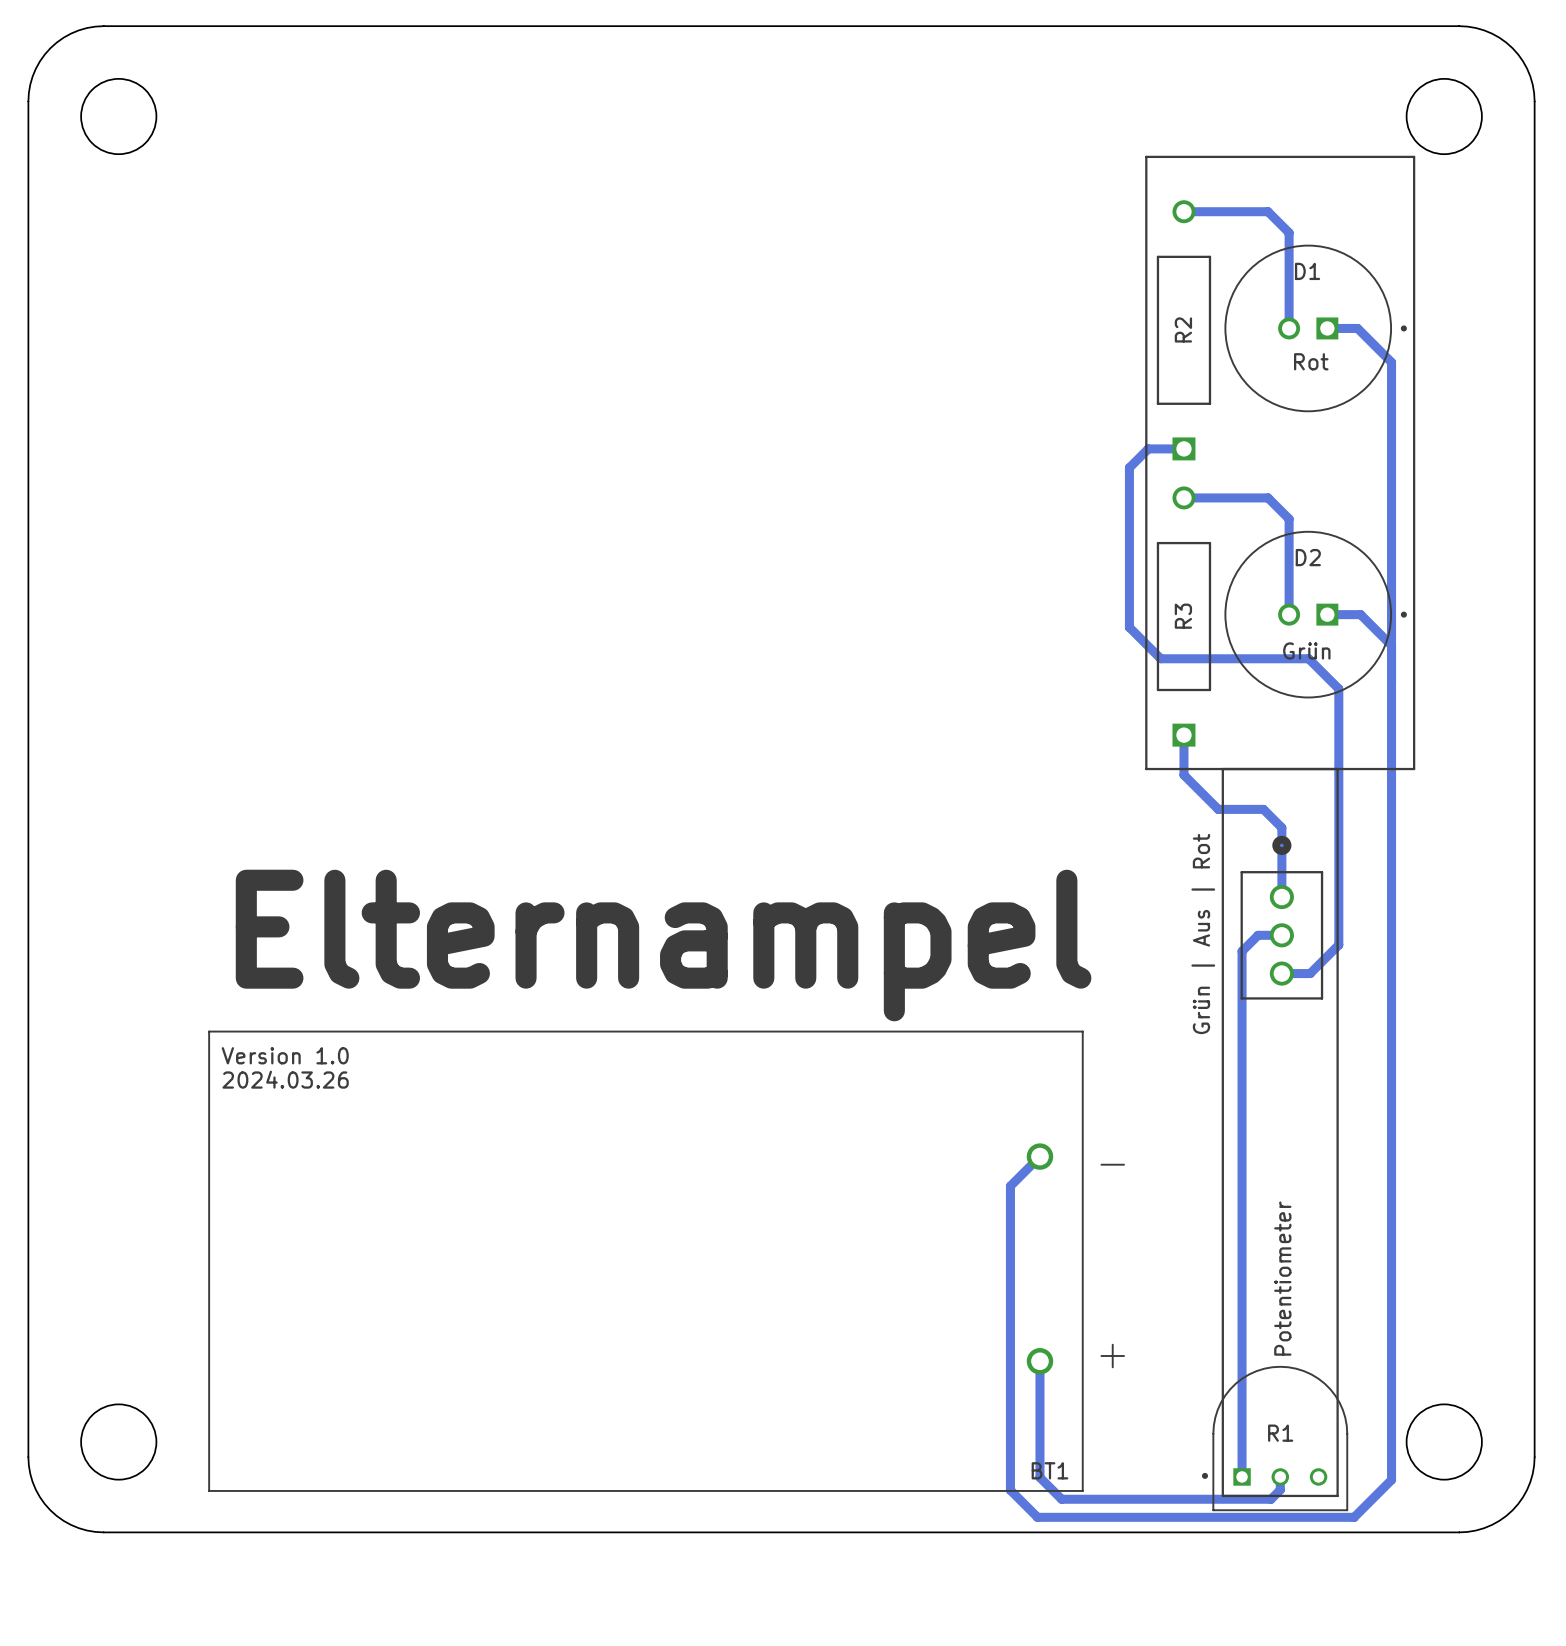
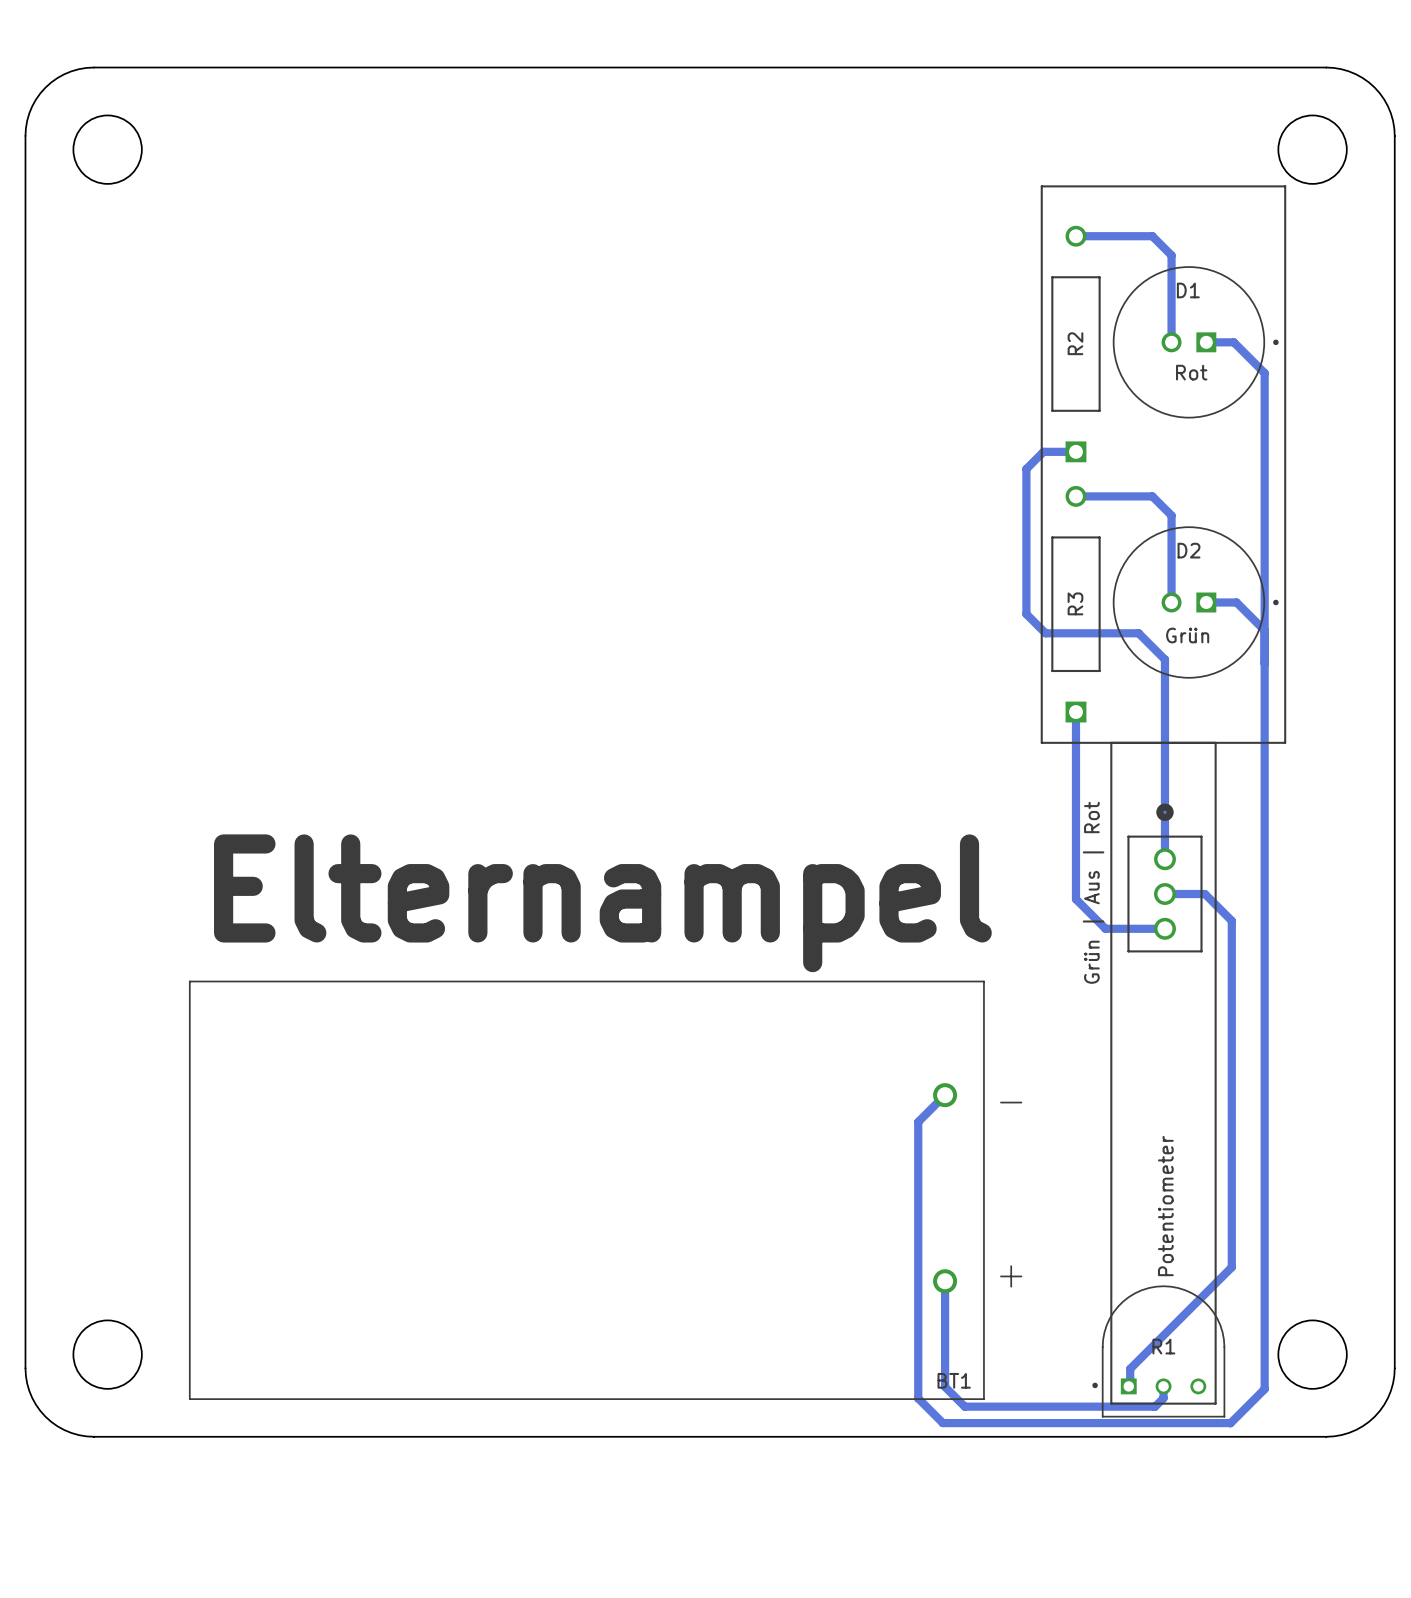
bottom track: (1150, 648) (1160, 658) (1308, 658) (1338, 688) (1338, 944) (1310, 973) (1281, 973) -> (1075, 748) (1075, 899) (1105, 928) (1164, 928)
bottom track: (1183, 775) (1218, 809) (1263, 809) (1281, 827) -> (1045, 633) (1138, 633) (1164, 659) (1164, 796)
bottom track: (1281, 935) (1258, 935) (1242, 951) (1242, 1476) -> (1164, 894) (1204, 894) (1231, 920) (1231, 1267) (1130, 1368) (1130, 1386)
text: Version 1.0 (285, 1055) -> none
text: 2024.03.26 (285, 1079) -> none

